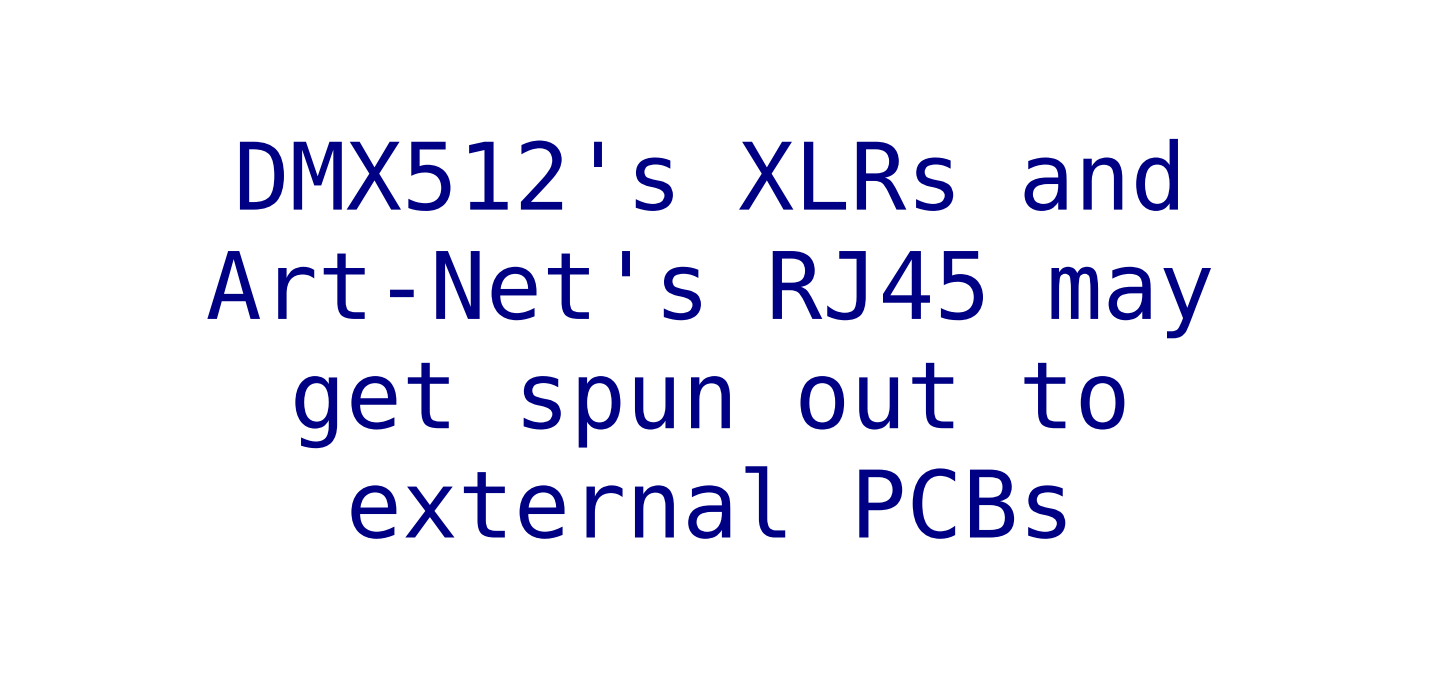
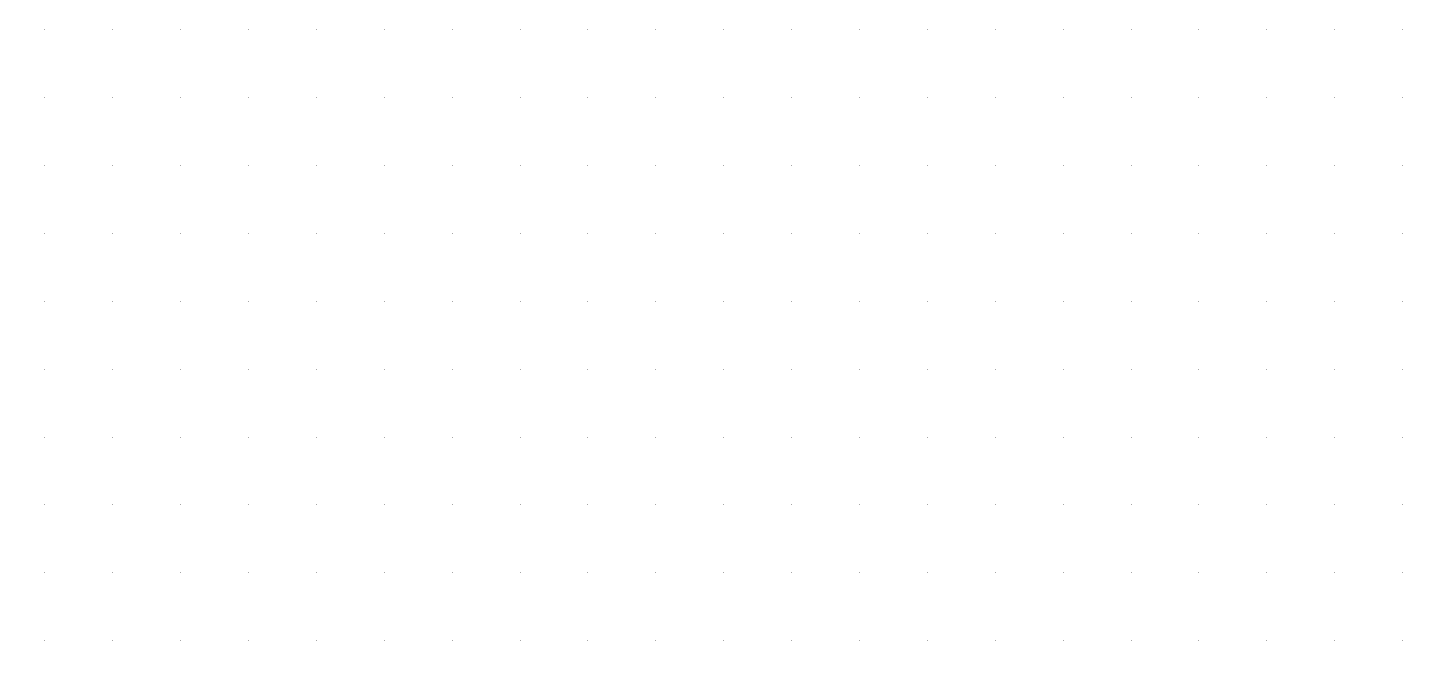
text: DMX512's XLRs and (708, 174) -> none
text: Art-Net's RJ45 may (709, 294) -> none
text: get spun out to (709, 405) -> none
text: external PCBs (708, 502) -> none

